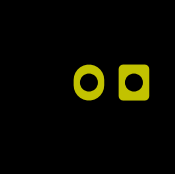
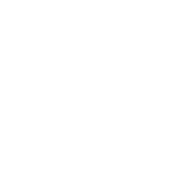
part: (111, 82) -> none

